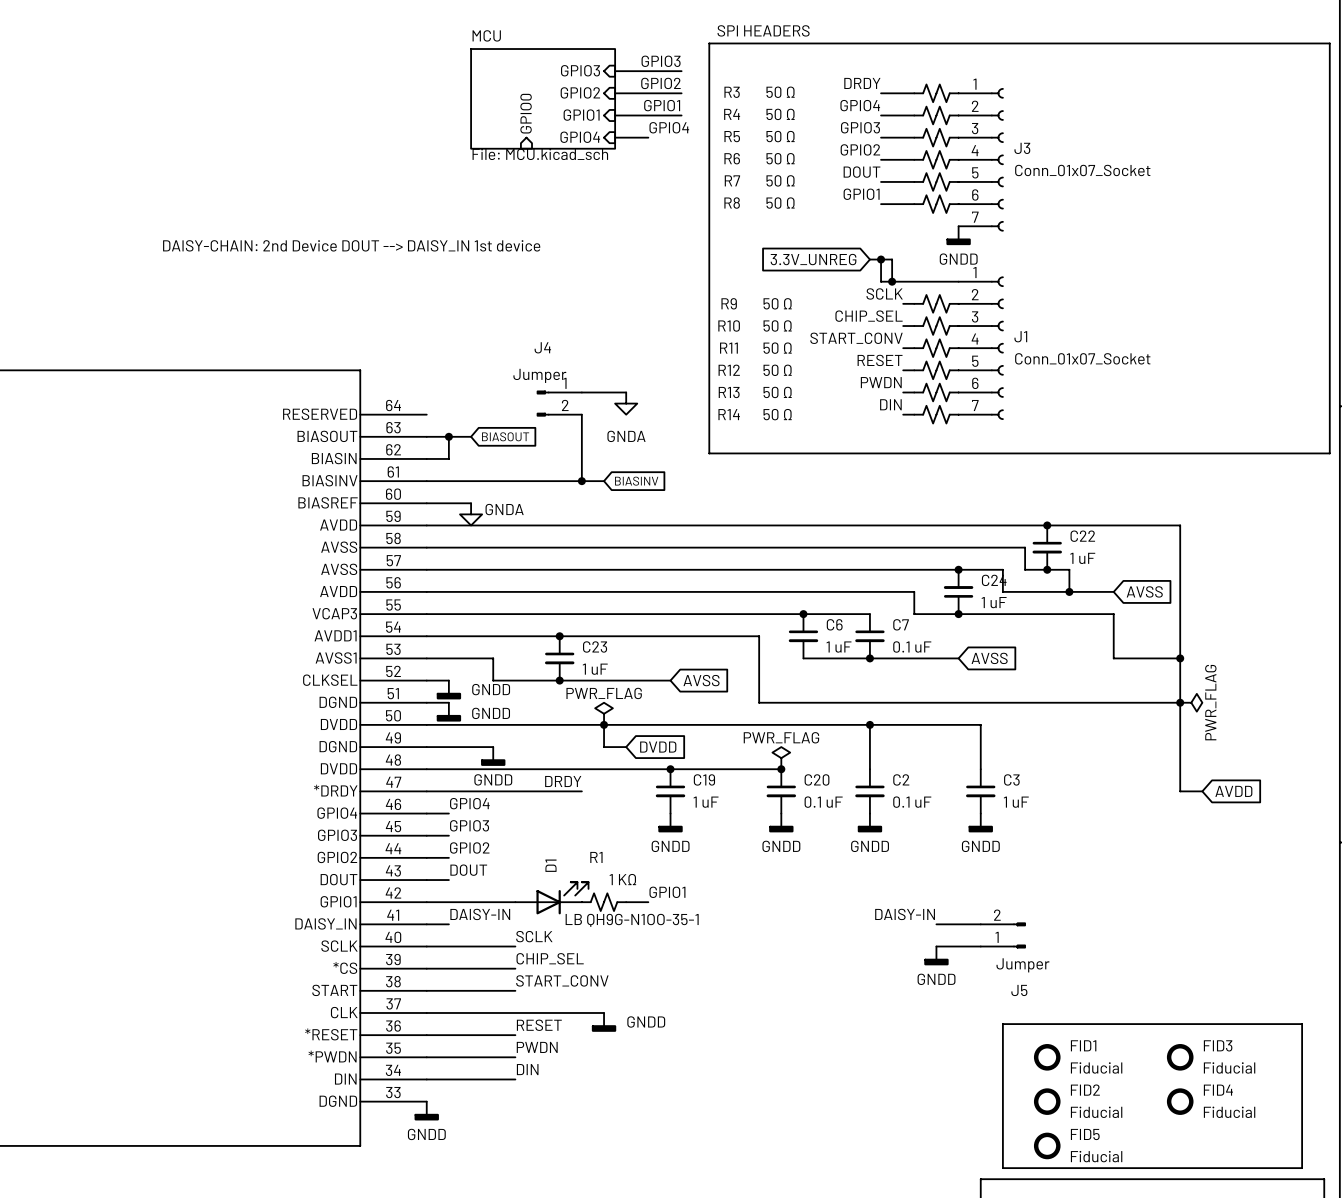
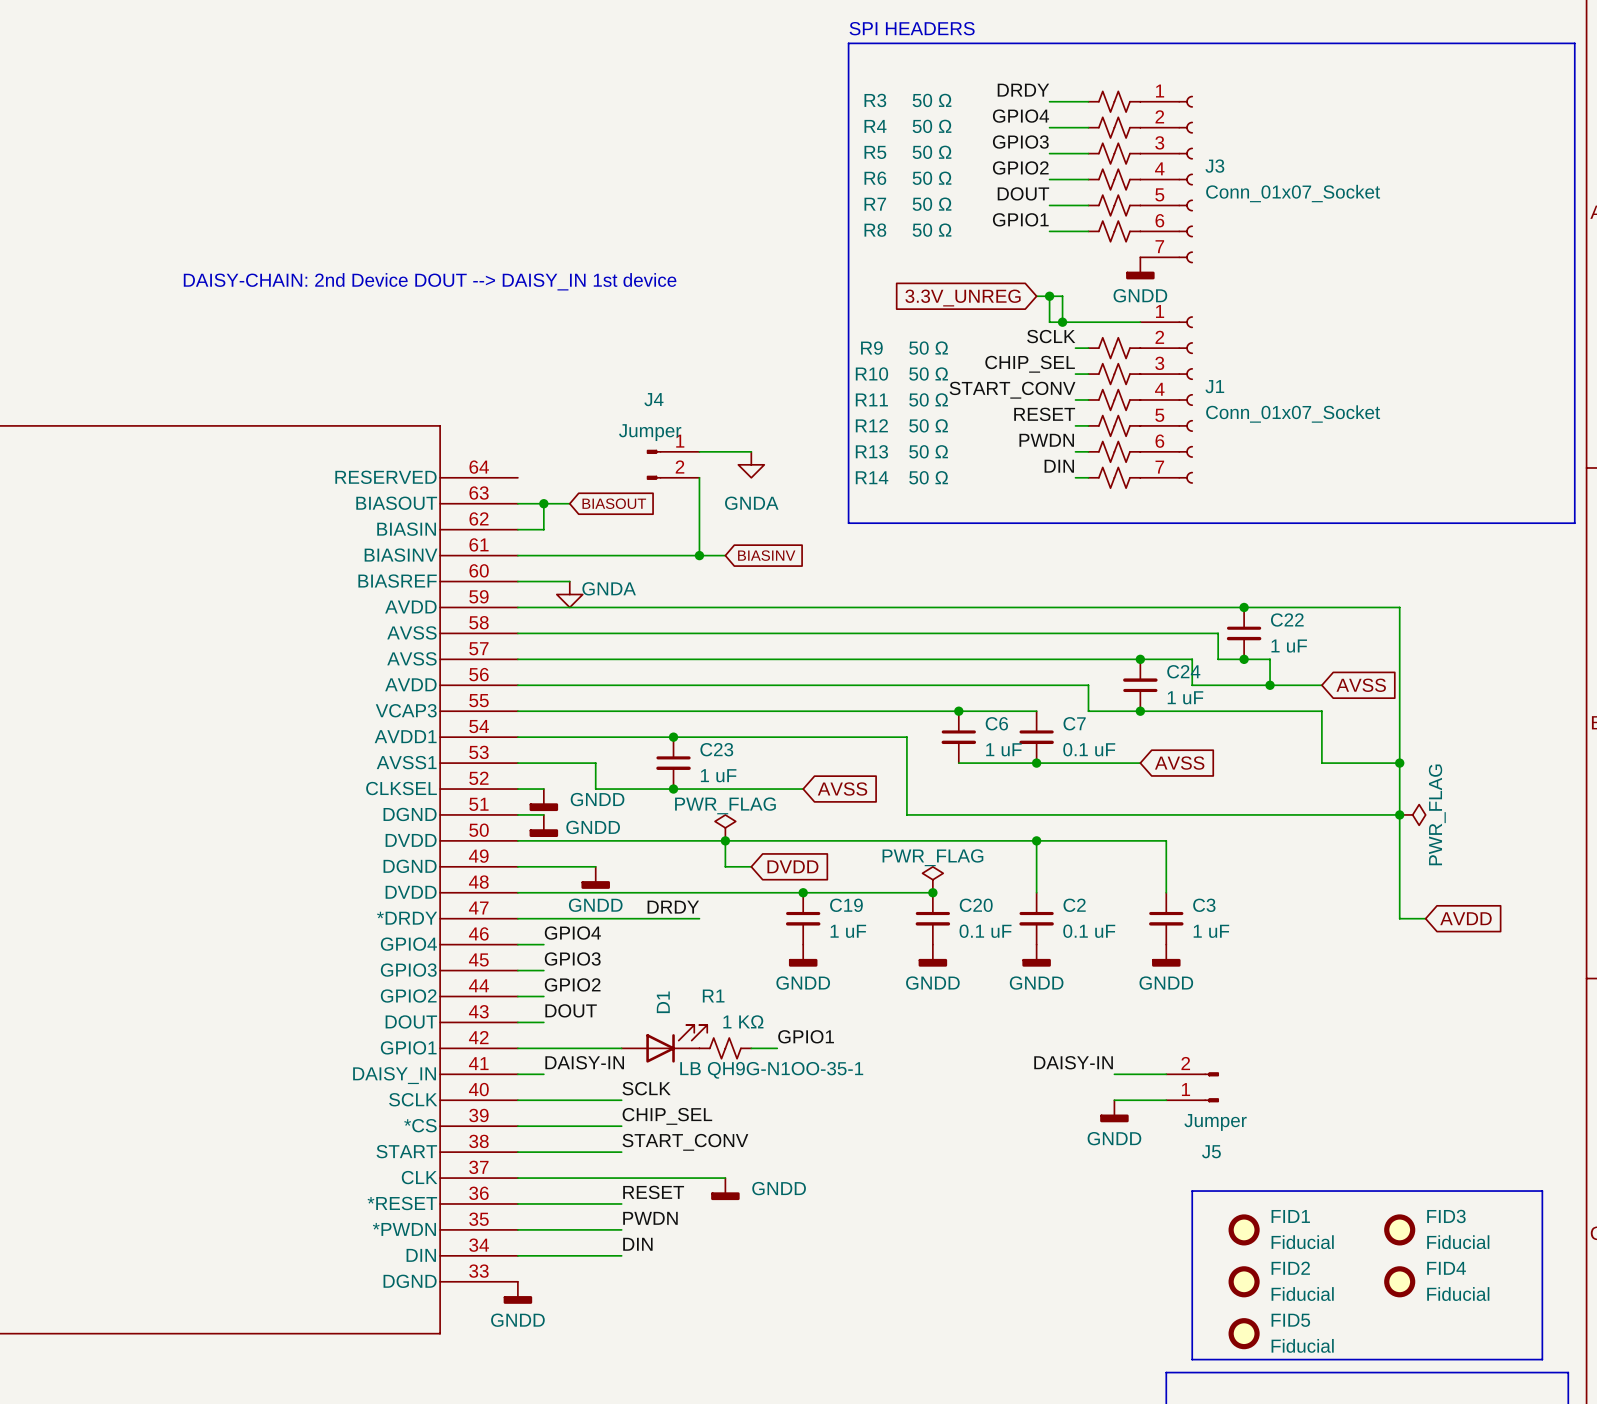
label: GPIO3 (661, 61) -> none
sheet pin: GPIO3 (580, 70) -> none
wire: (615, 71) (681, 71) -> none
label: GPIO2 (660, 83) -> none
sheet pin: GPIO2 (580, 92) -> none
wire: (615, 93) (681, 93) -> none
sheet MCU: File: MCU.kicad_sch (543, 98) -> none
label: GPIO1 (662, 105) -> none
sheet pin: GPIO0 (526, 113) -> none
sheet pin: GPIO1 (581, 115) -> none
wire: (615, 115) (681, 115) -> none
label: GPIO4 (669, 127) -> none
sheet pin: GPIO4 (580, 137) -> none
wire: (615, 137) (648, 137) -> none

